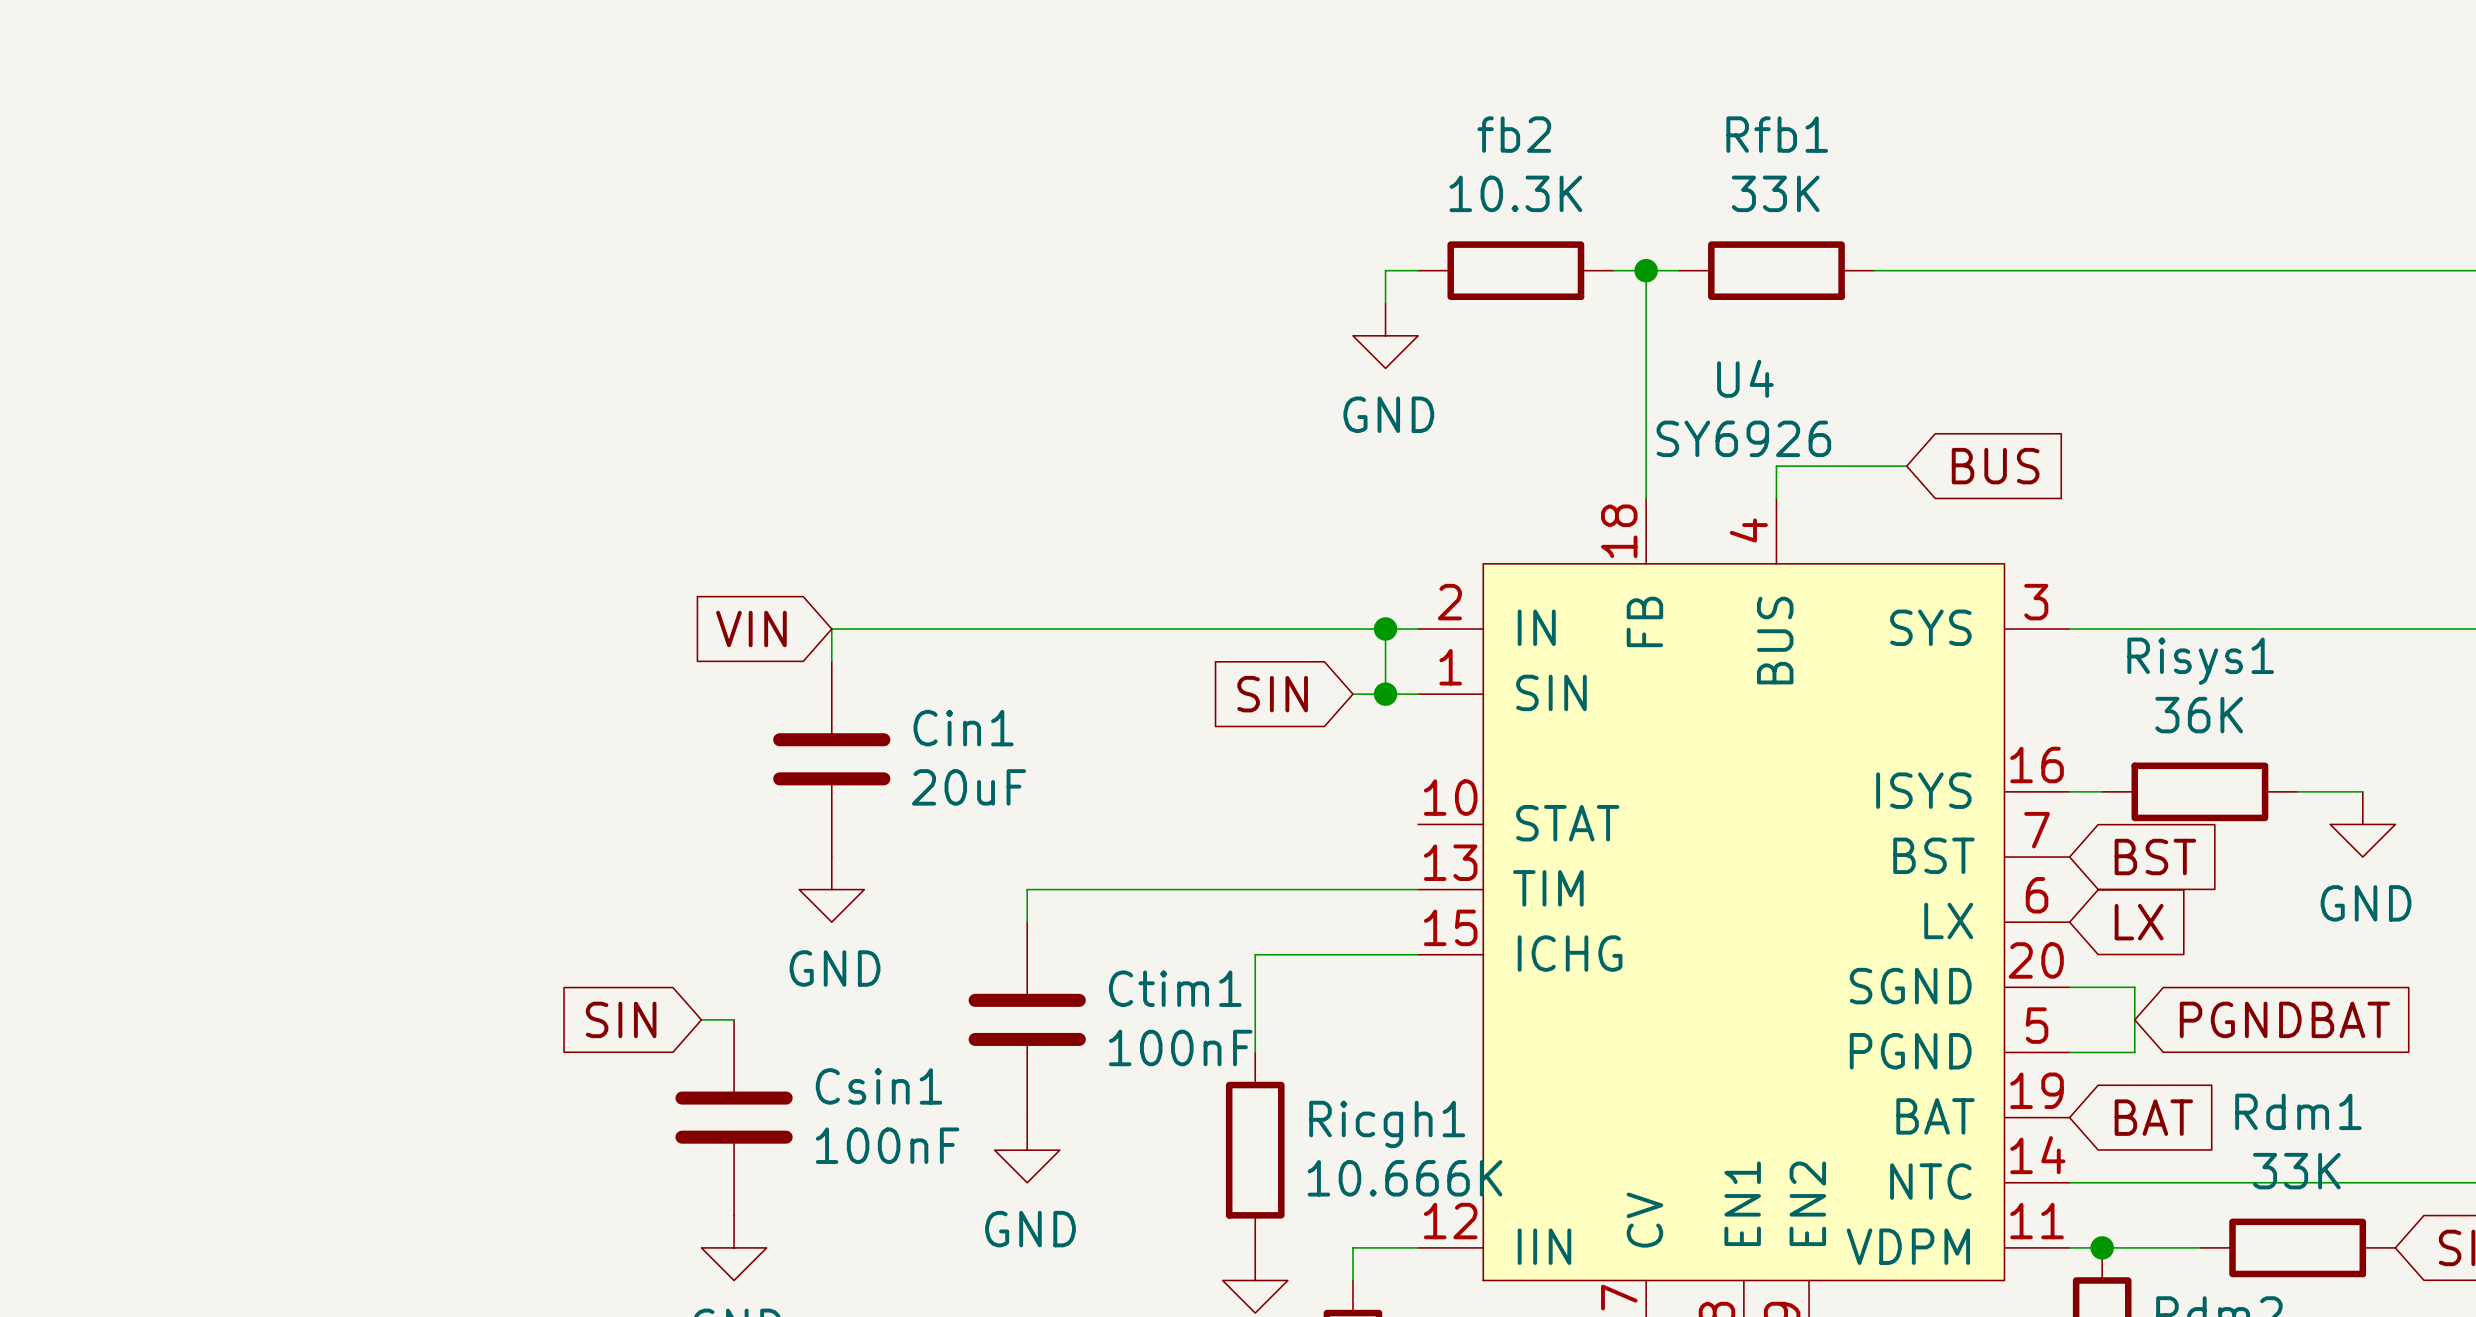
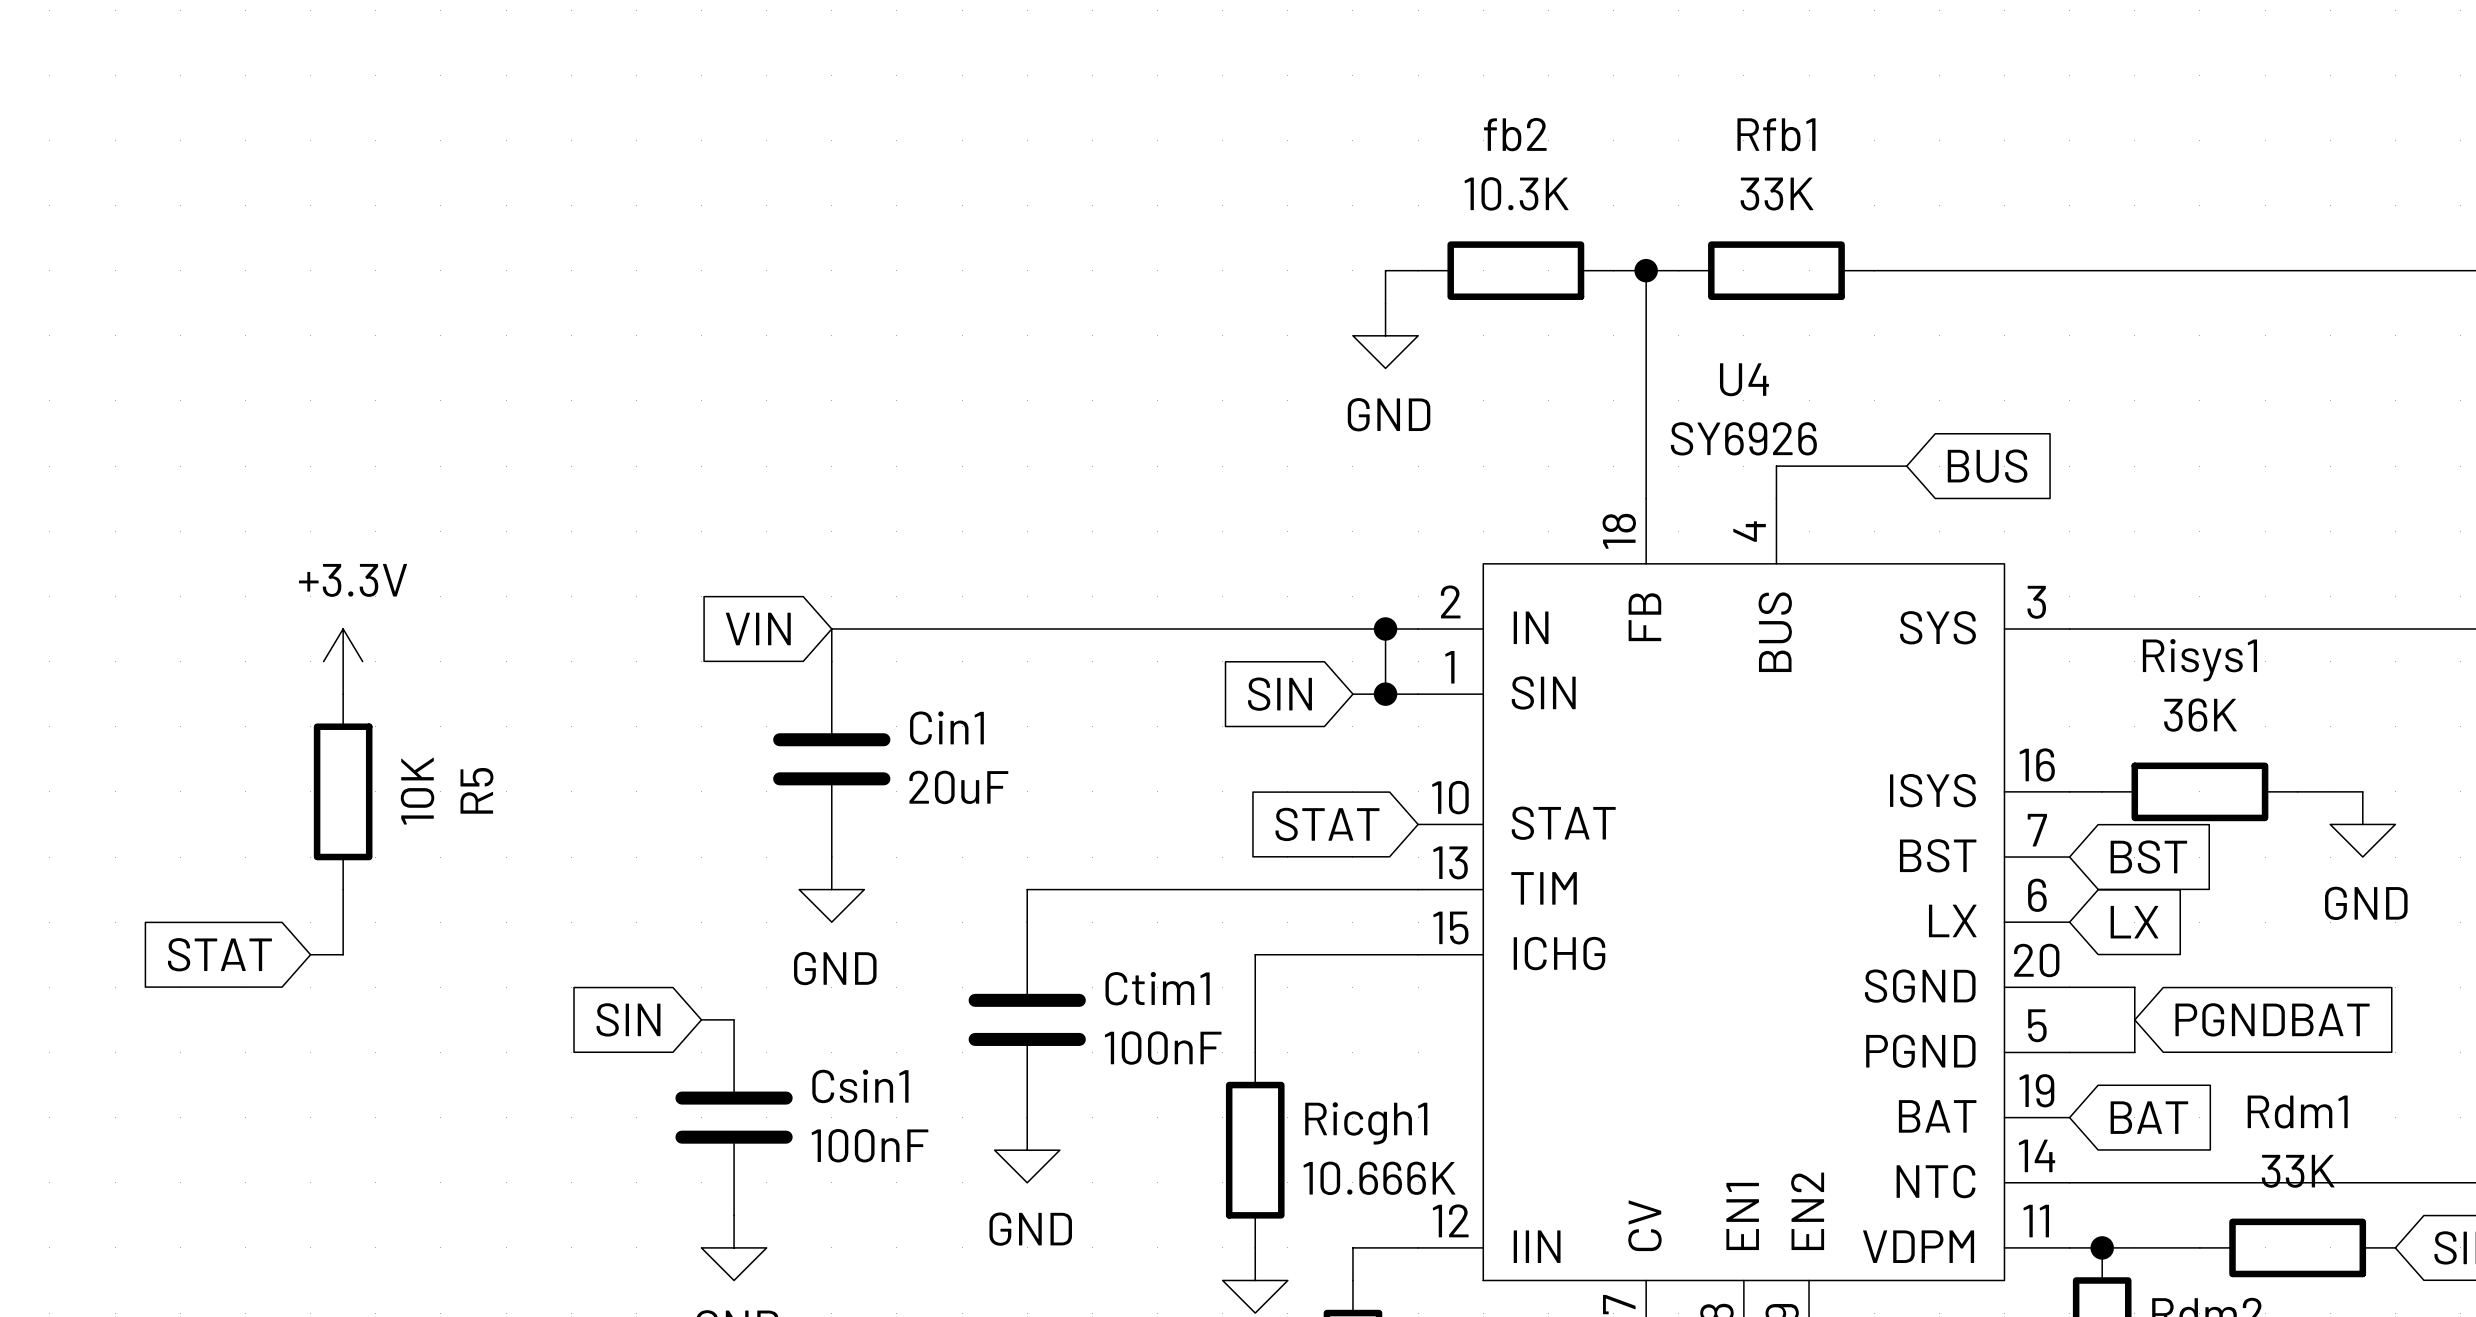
power symbol: none -> +3.3V (343, 661)
R5: none -> 10K (343, 791)
global label: none -> STAT (1327, 824)
wire: none -> (343, 889) (343, 954) (310, 954)
global label: none -> STAT (219, 954)

